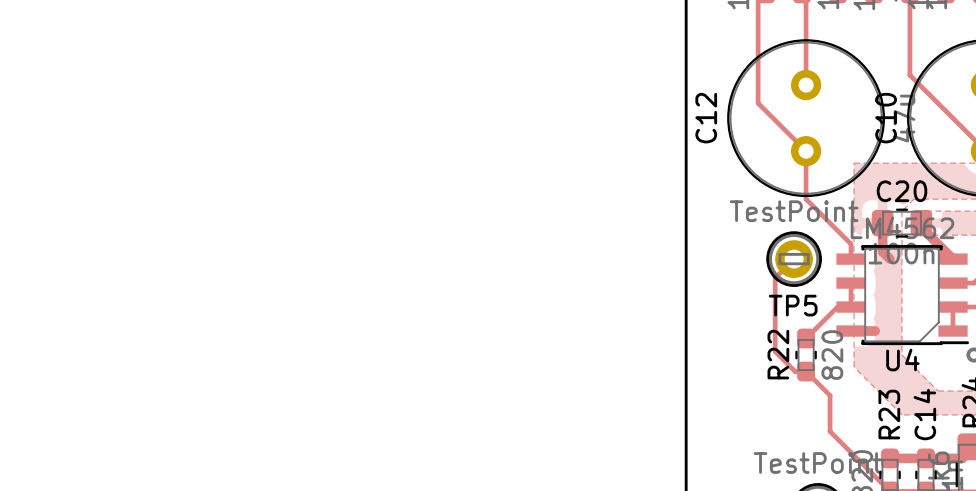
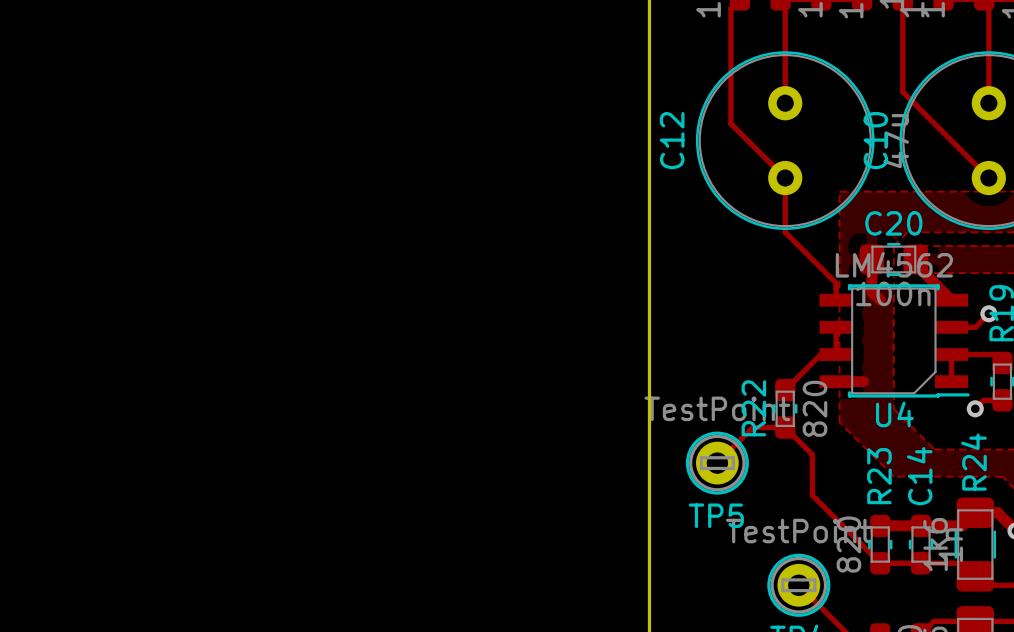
track: (794, 259) (775, 277) (775, 351) (795, 371) -> (717, 463) (752, 427) (772, 427)
TP5 position: (794, 259) -> (717, 463)

